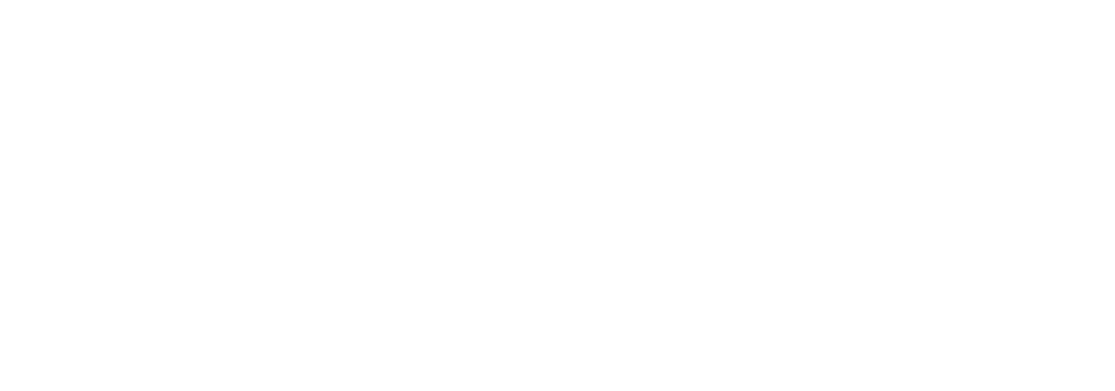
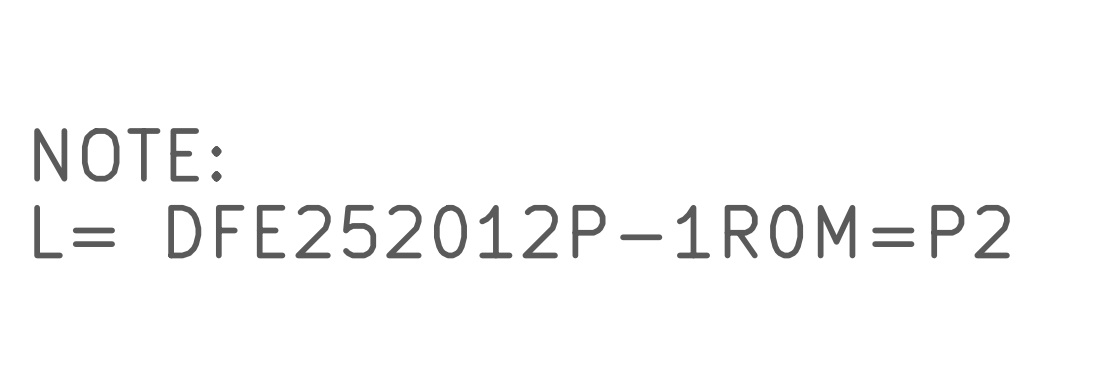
text: none -> NOTE: (127, 154)
text: none -> L= DFE252012P-1R0M=P2 (522, 231)

